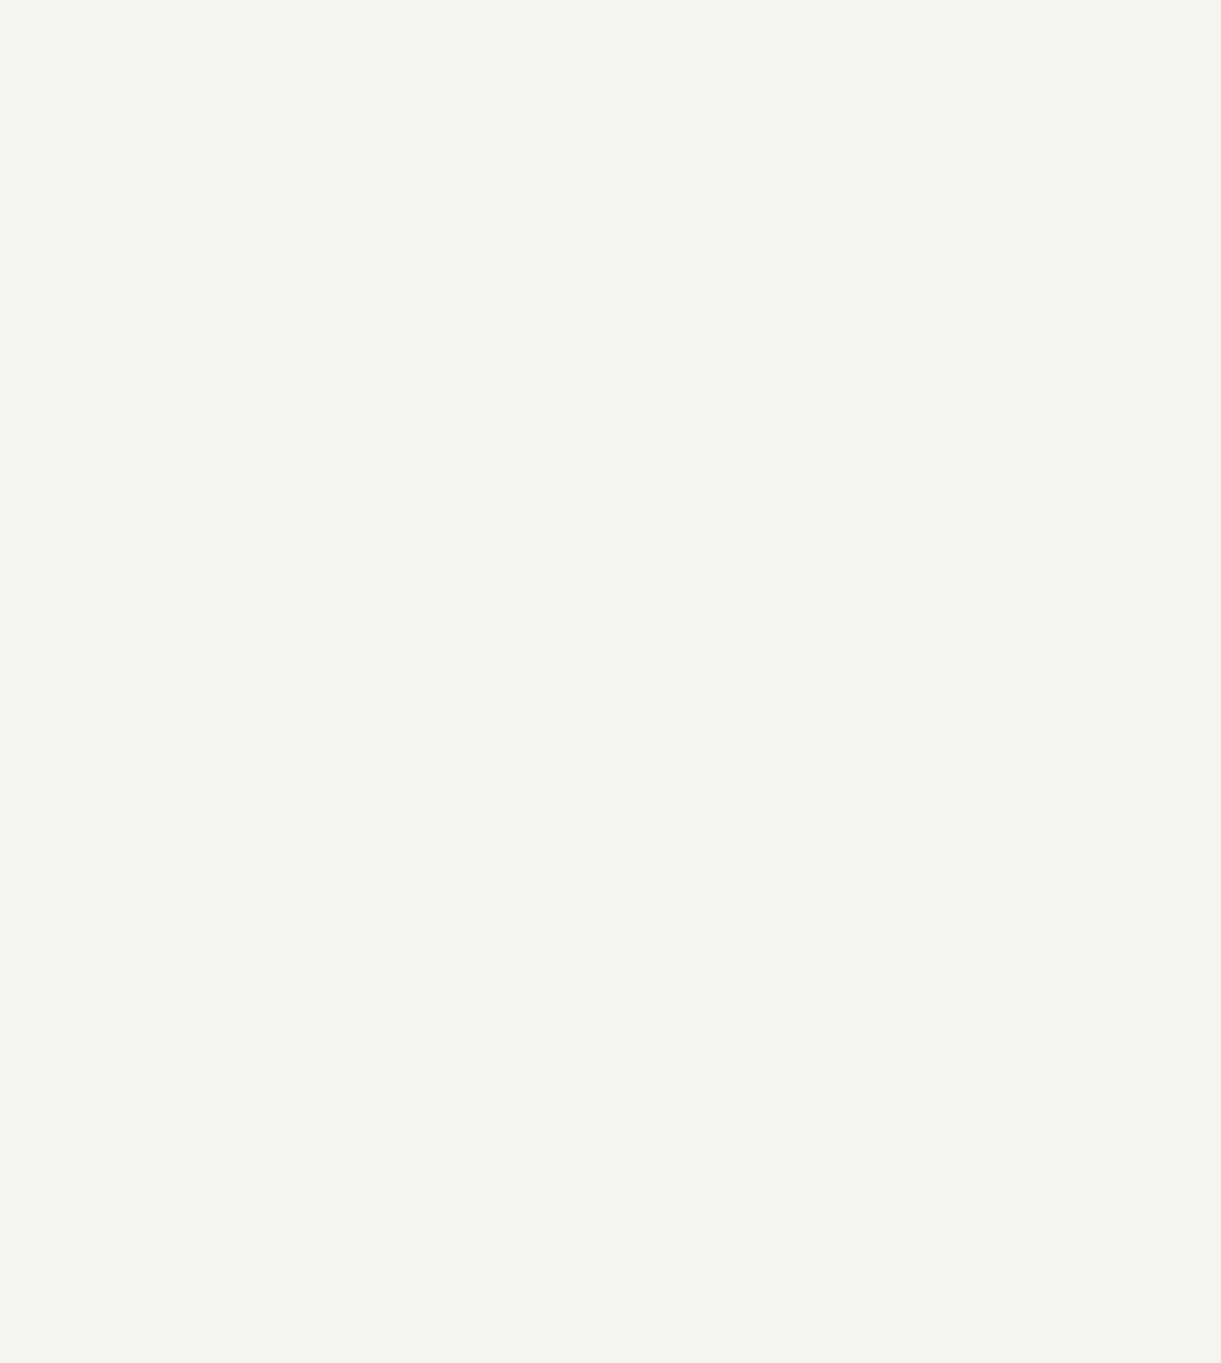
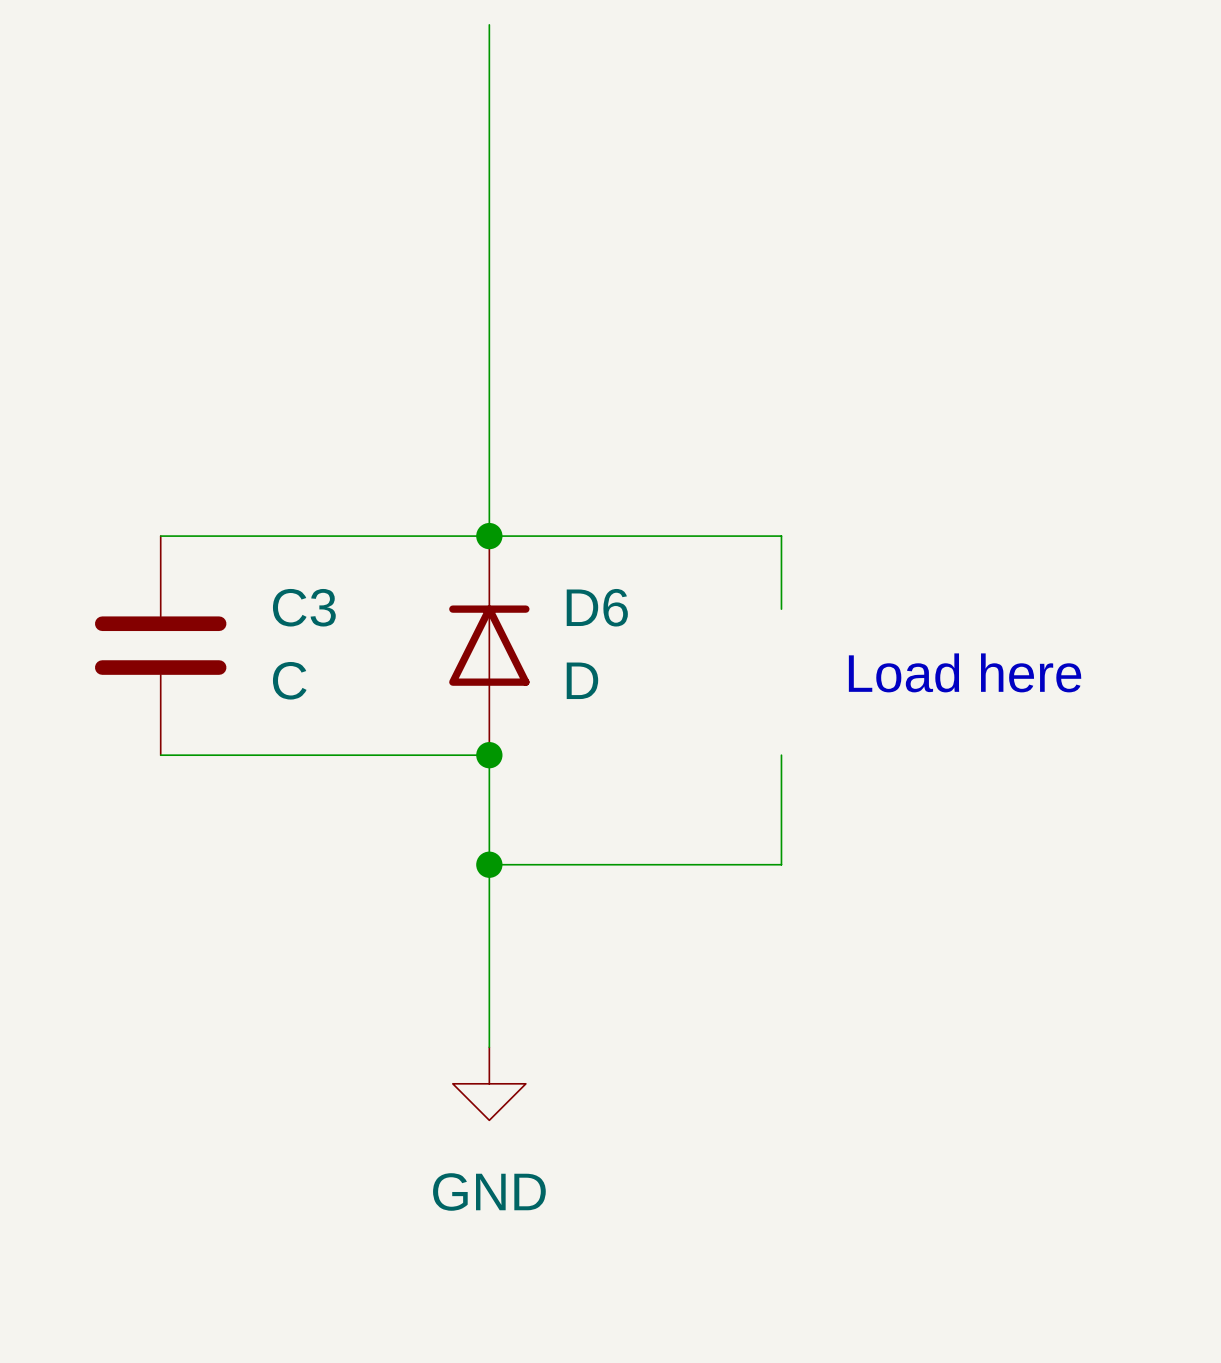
wire: none -> (489, 24) (489, 536)
wire: none -> (160, 536) (781, 536) (781, 609)
junction: none -> (489, 536)
C3: none -> C (160, 645)
D6: none -> D (489, 645)
text: none -> Load here (965, 672)
wire: none -> (160, 755) (489, 755) (489, 1047)
junction: none -> (489, 755)
wire: none -> (781, 755) (781, 864) (489, 864)
junction: none -> (489, 864)
power symbol: none -> GND (489, 1083)

